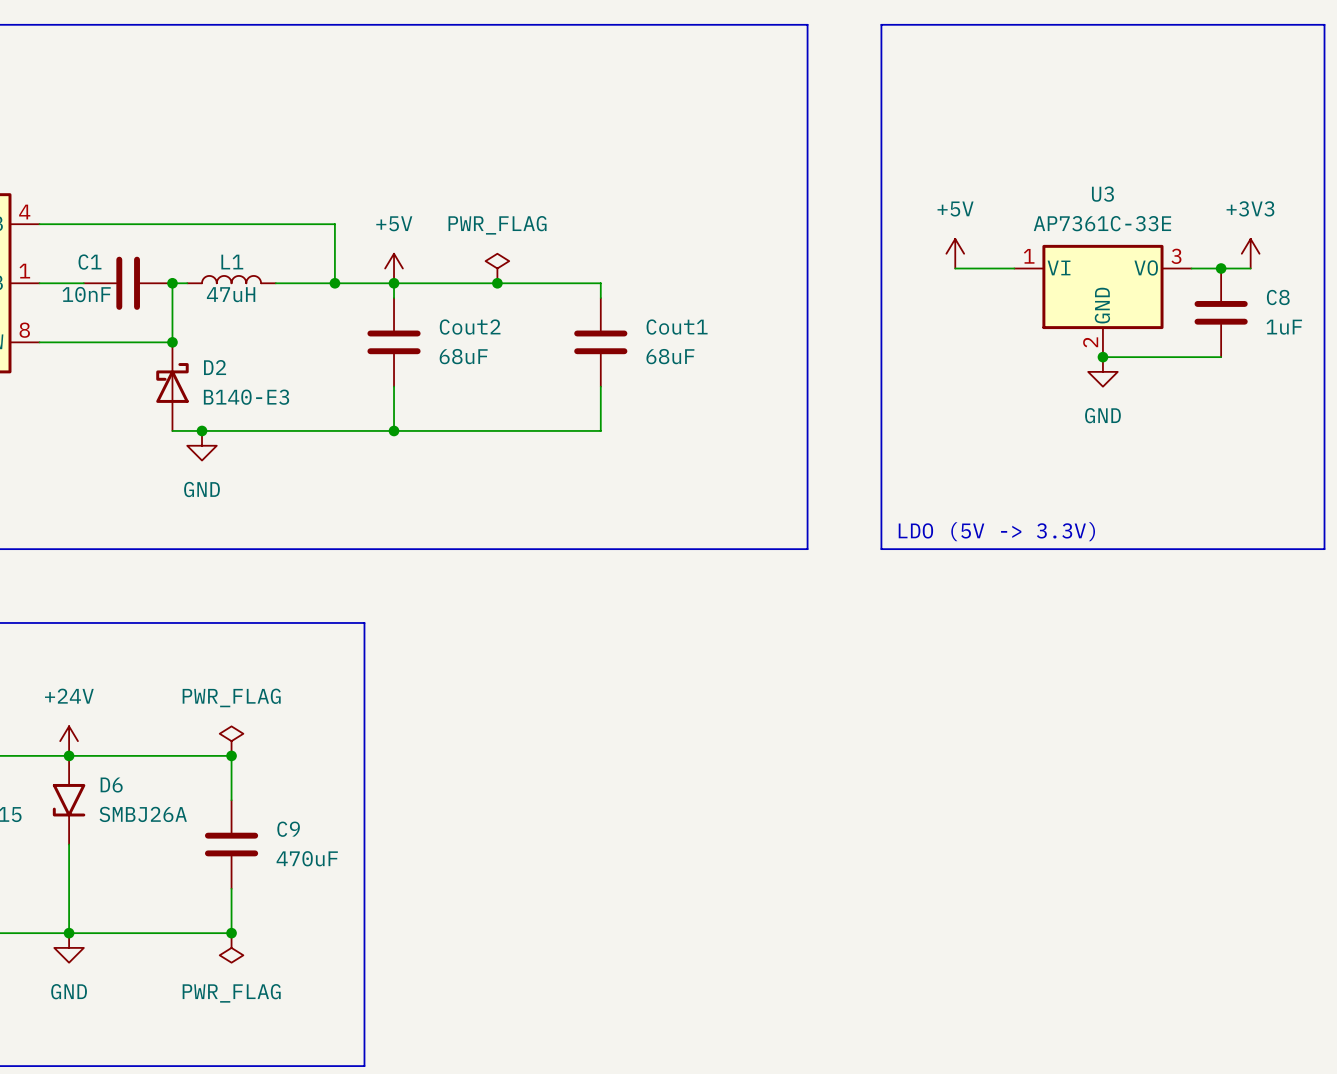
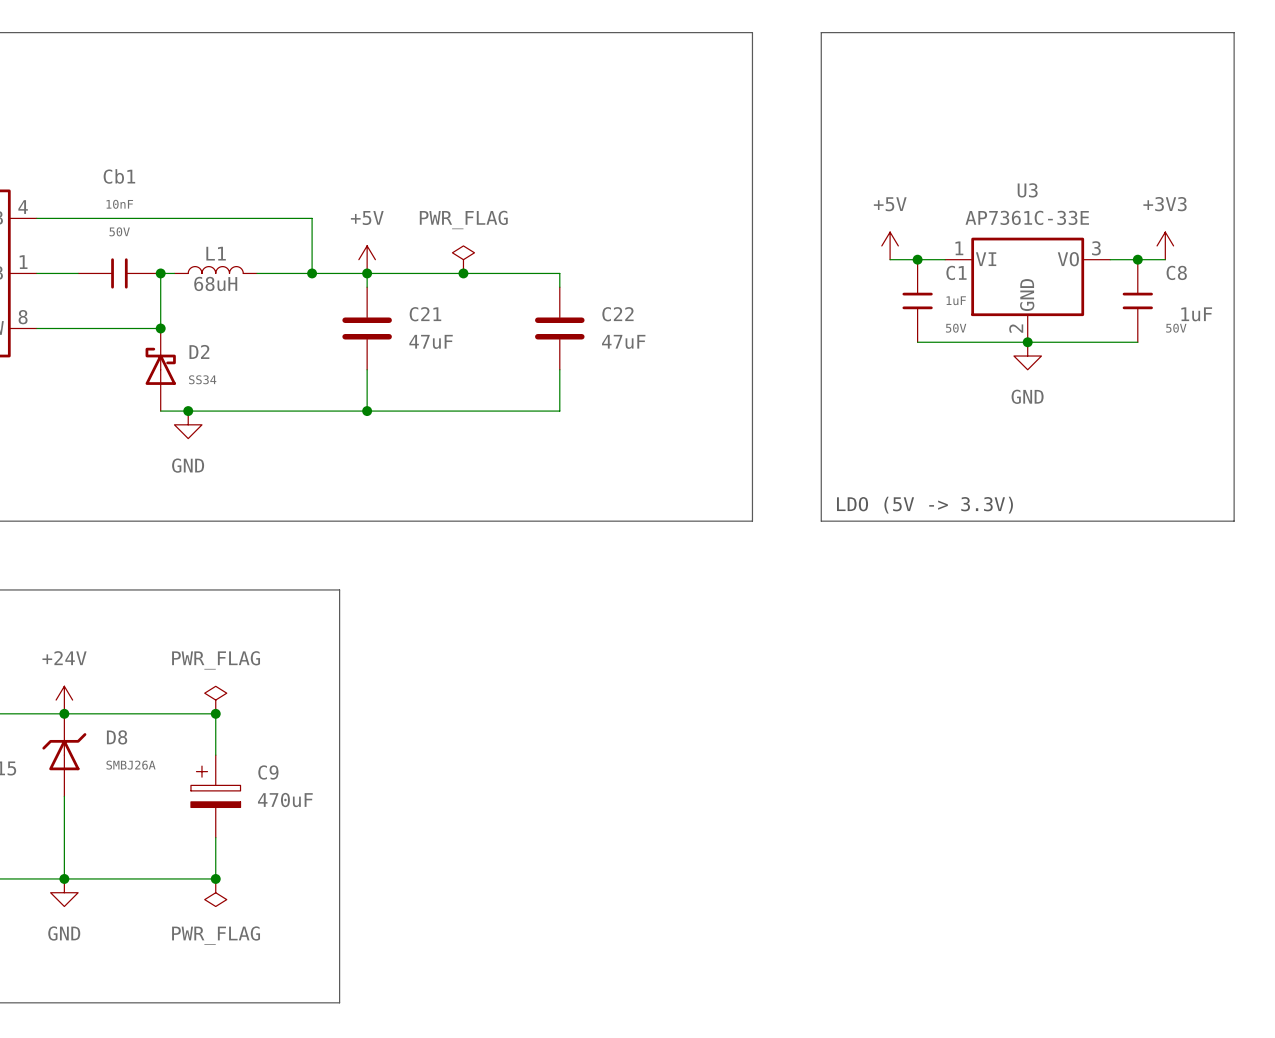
C1 symbol: [83, 256, 173, 310] -> [902, 259, 933, 343]
C1 name position: C1 (90, 262) -> C1 (956, 272)
junction: none -> (917, 259)
C8 symbol: [1194, 268, 1248, 358] -> [1122, 259, 1153, 343]
Cb1: none -> 10nF (119, 273)
C1 value: 10nF (86, 294) -> 1uF (956, 300)
L1 value: 47uH (231, 294) -> 68uH (215, 283)
C8 name position: C8 (1278, 297) -> C8 (1176, 272)
Cout2 name: Cout2 (470, 327) -> C21 (425, 314)
Cout1 name: Cout1 (677, 327) -> C22 (617, 314)
D2 symbol: [156, 342, 189, 431] -> [145, 328, 176, 412]
C1 text: none -> 50V (956, 328)
C8 text: none -> 50V (1176, 328)
Cout2 value: 68uF (463, 356) -> 47uF (431, 341)
Cout1 value: 68uF (670, 356) -> 47uF (623, 341)
wire: none -> (917, 342) (1027, 342)
D2 value: B140-E3 (246, 397) -> SS34 (202, 379)
D6: SMBJ26A (69, 800) -> none
D8: none -> SMBJ26A (64, 755)
C9 symbol: [204, 800, 259, 889] -> [190, 755, 241, 838]

